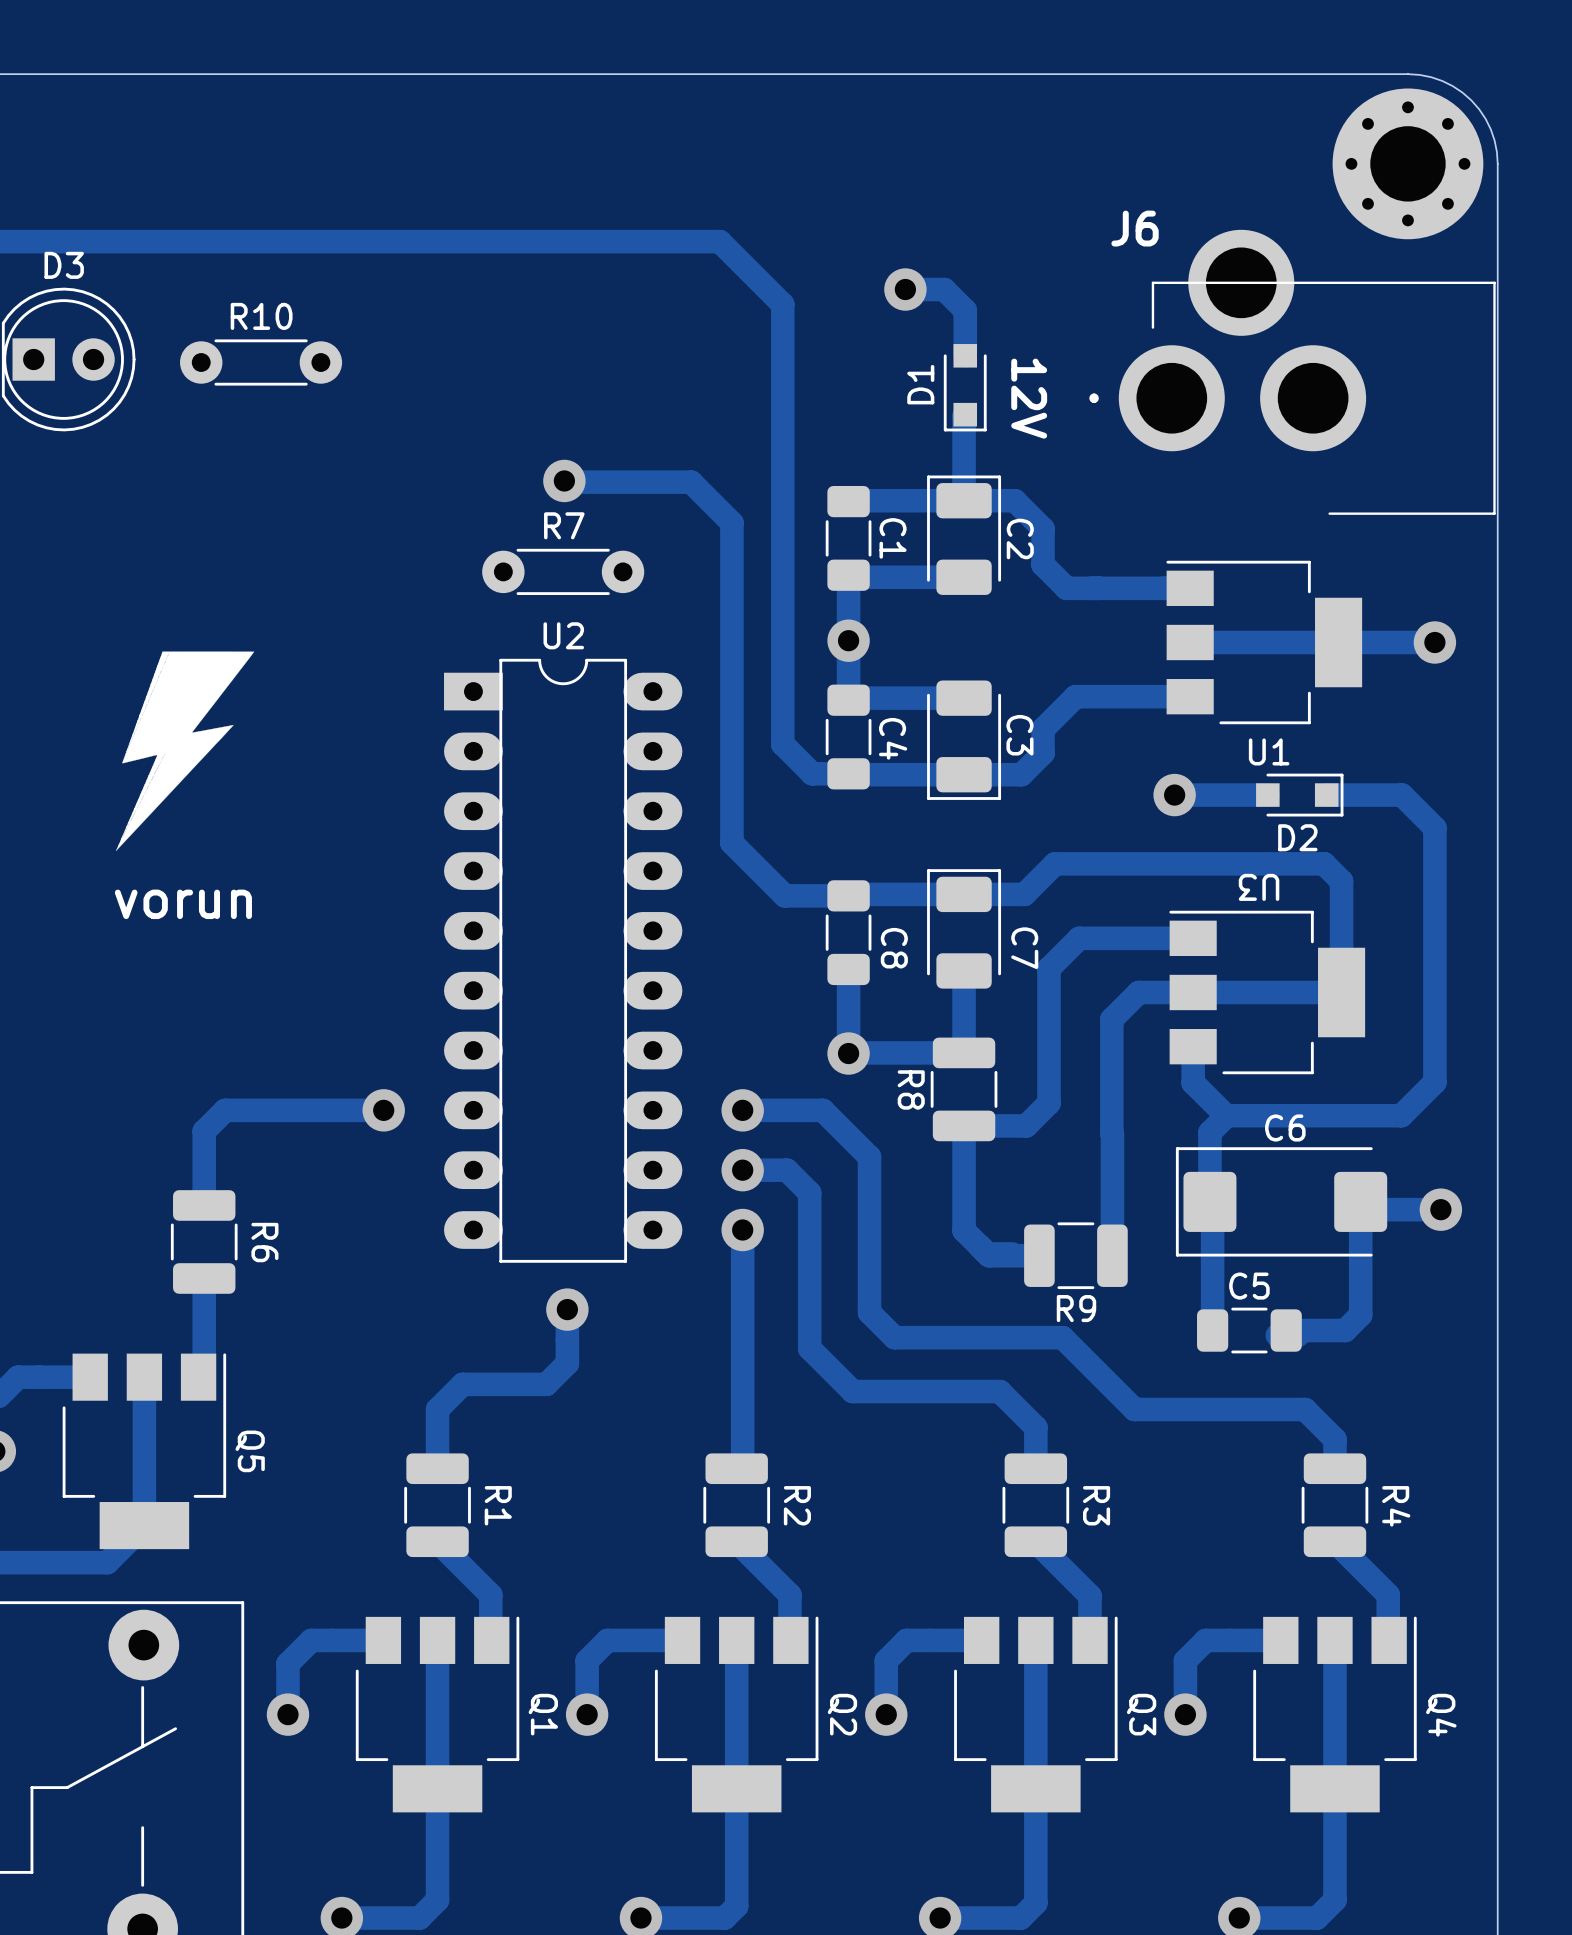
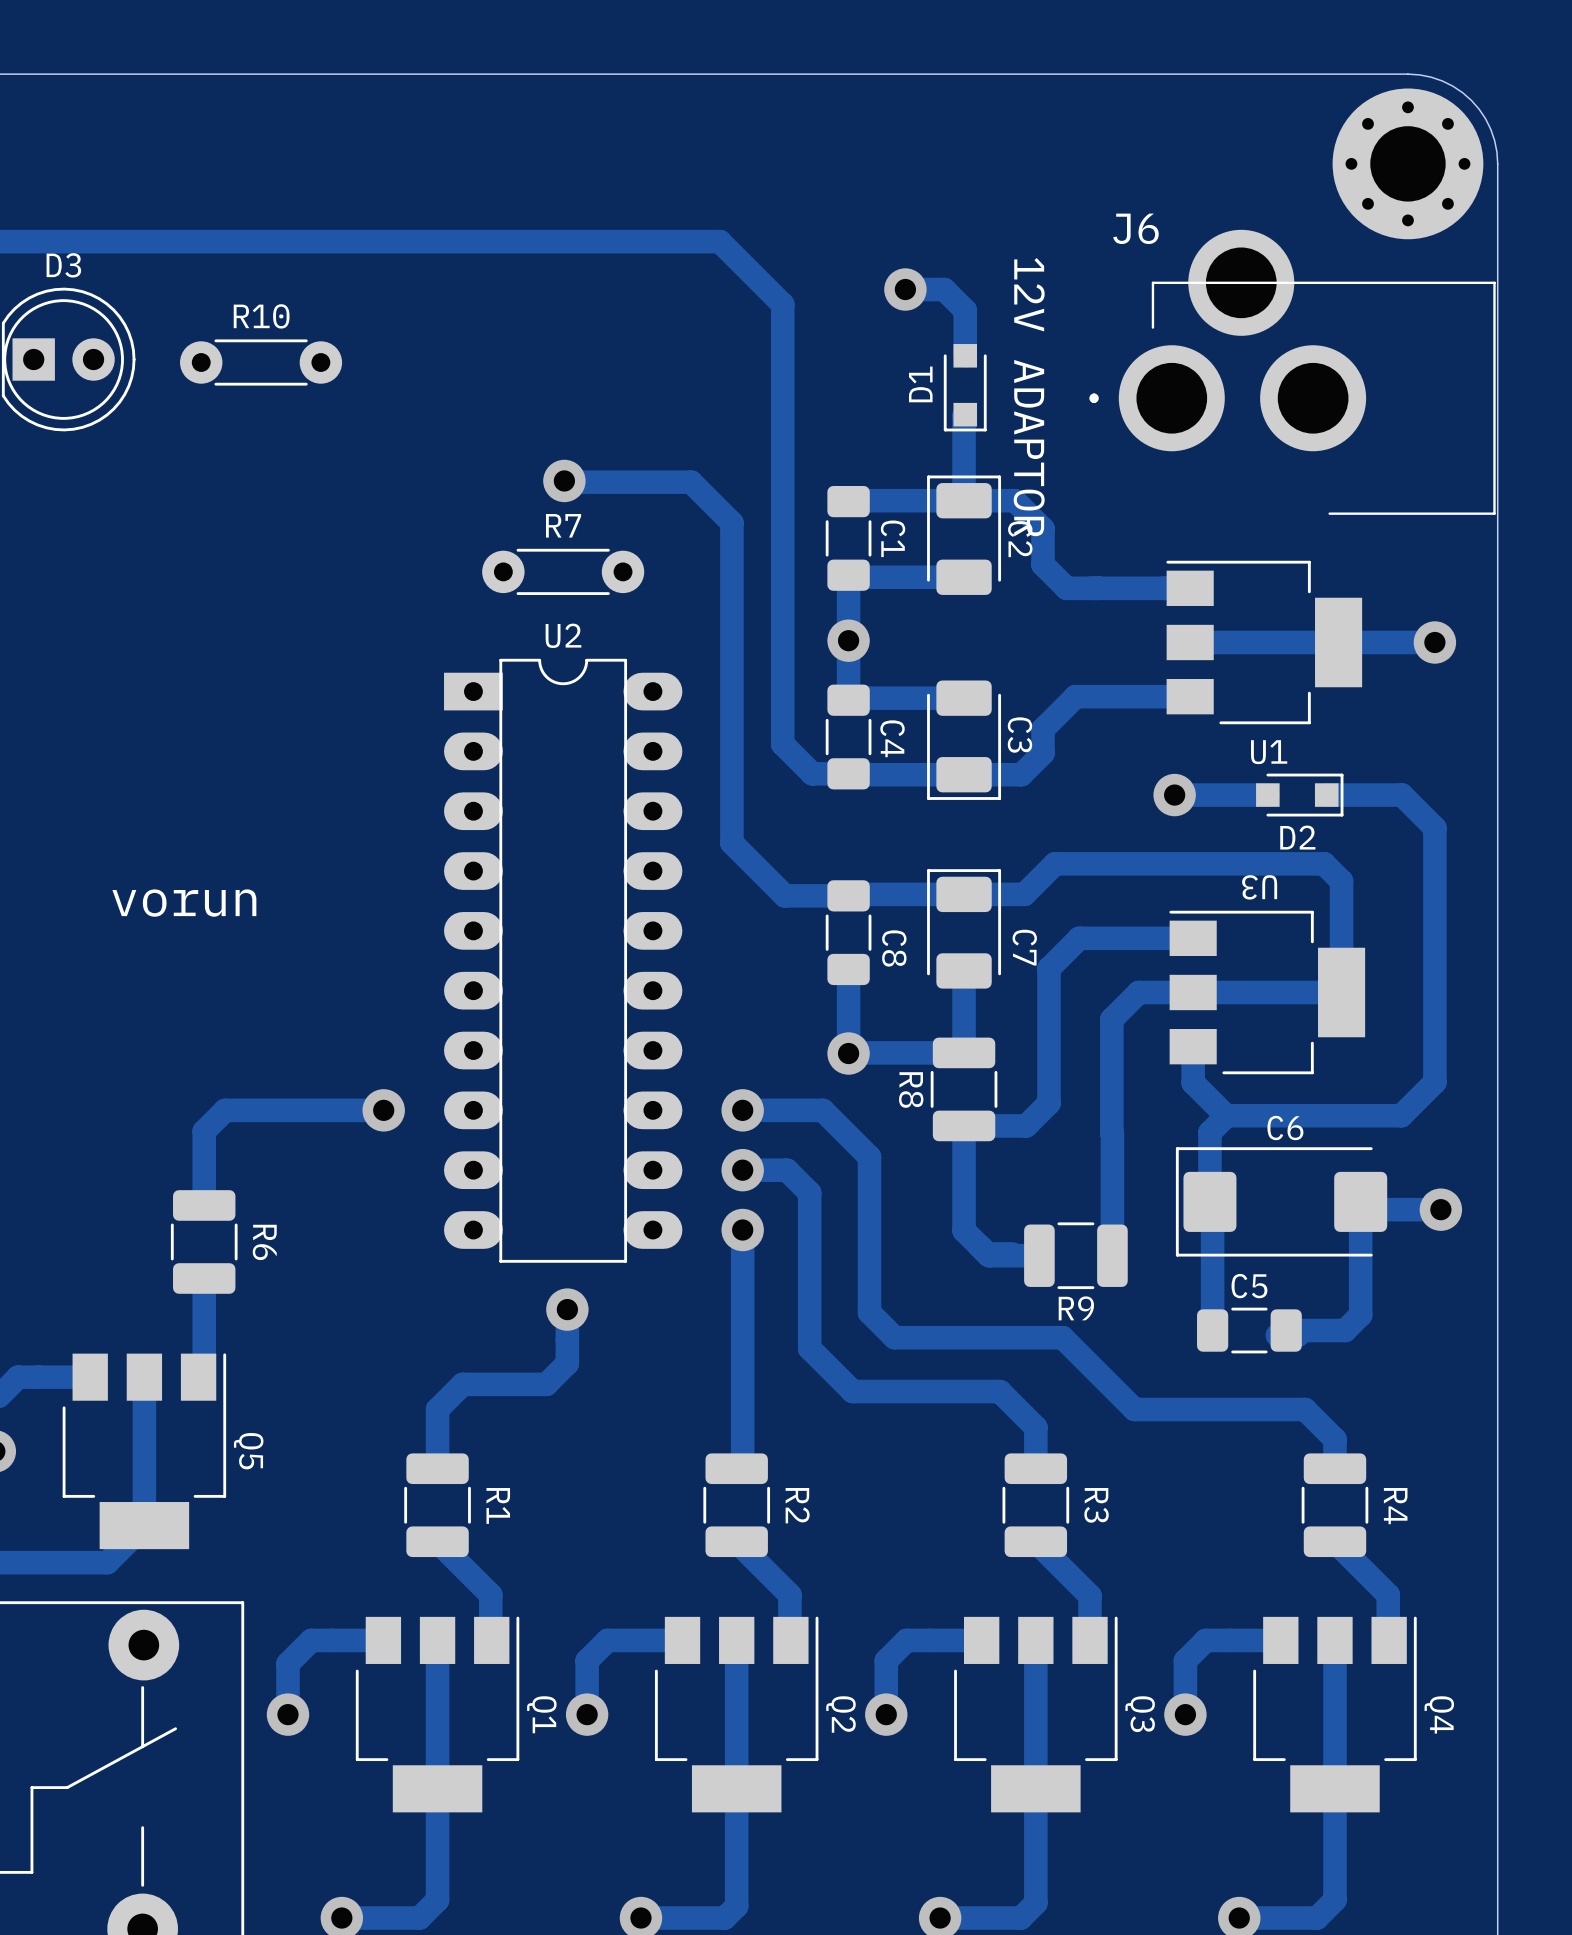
J6 value: 12V (1029, 398) -> 12V ADAPTOR (1029, 397)
drawing: [116, 651, 255, 851] -> none

